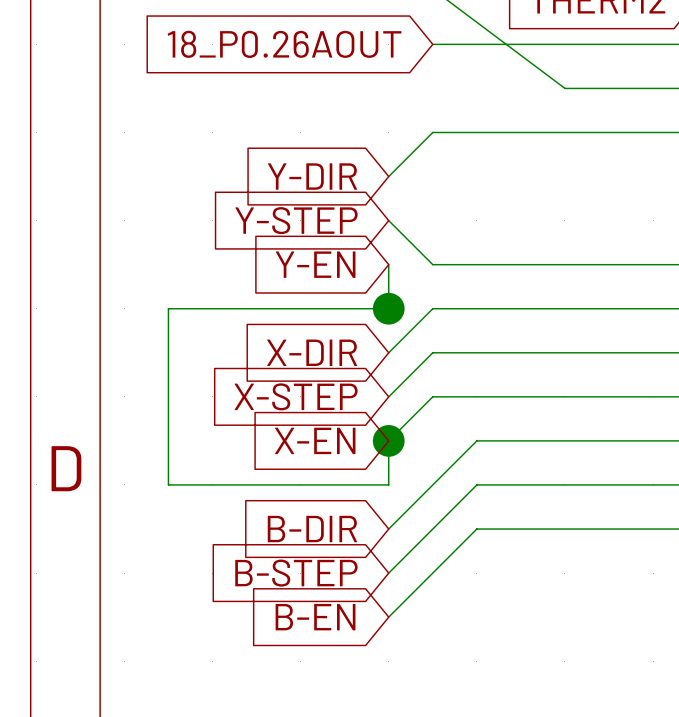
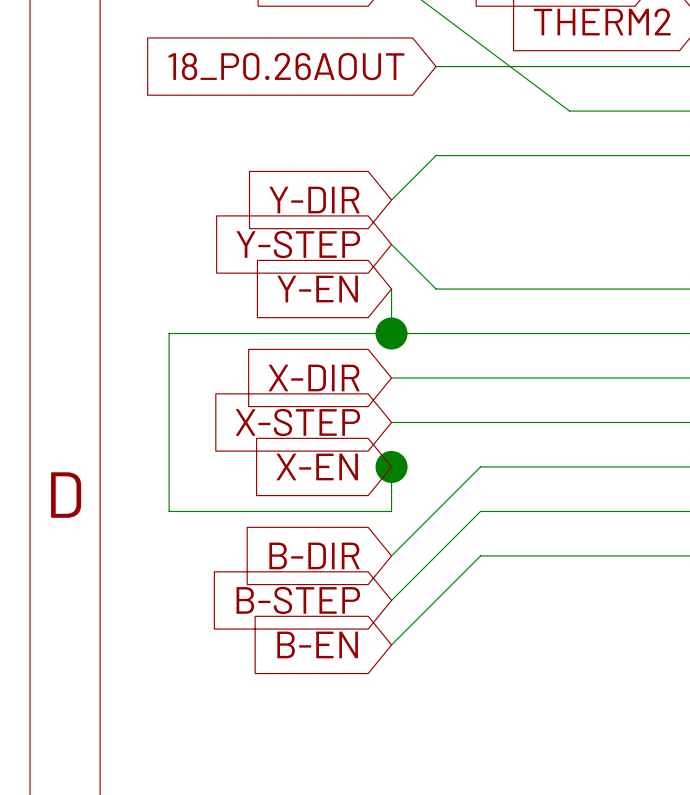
wire: (432, 308) (388, 352) -> (436, 333) (391, 333)
wire: (432, 352) (388, 396) -> (436, 378) (391, 378)
wire: (432, 396) (388, 440) -> (436, 422) (391, 422)

